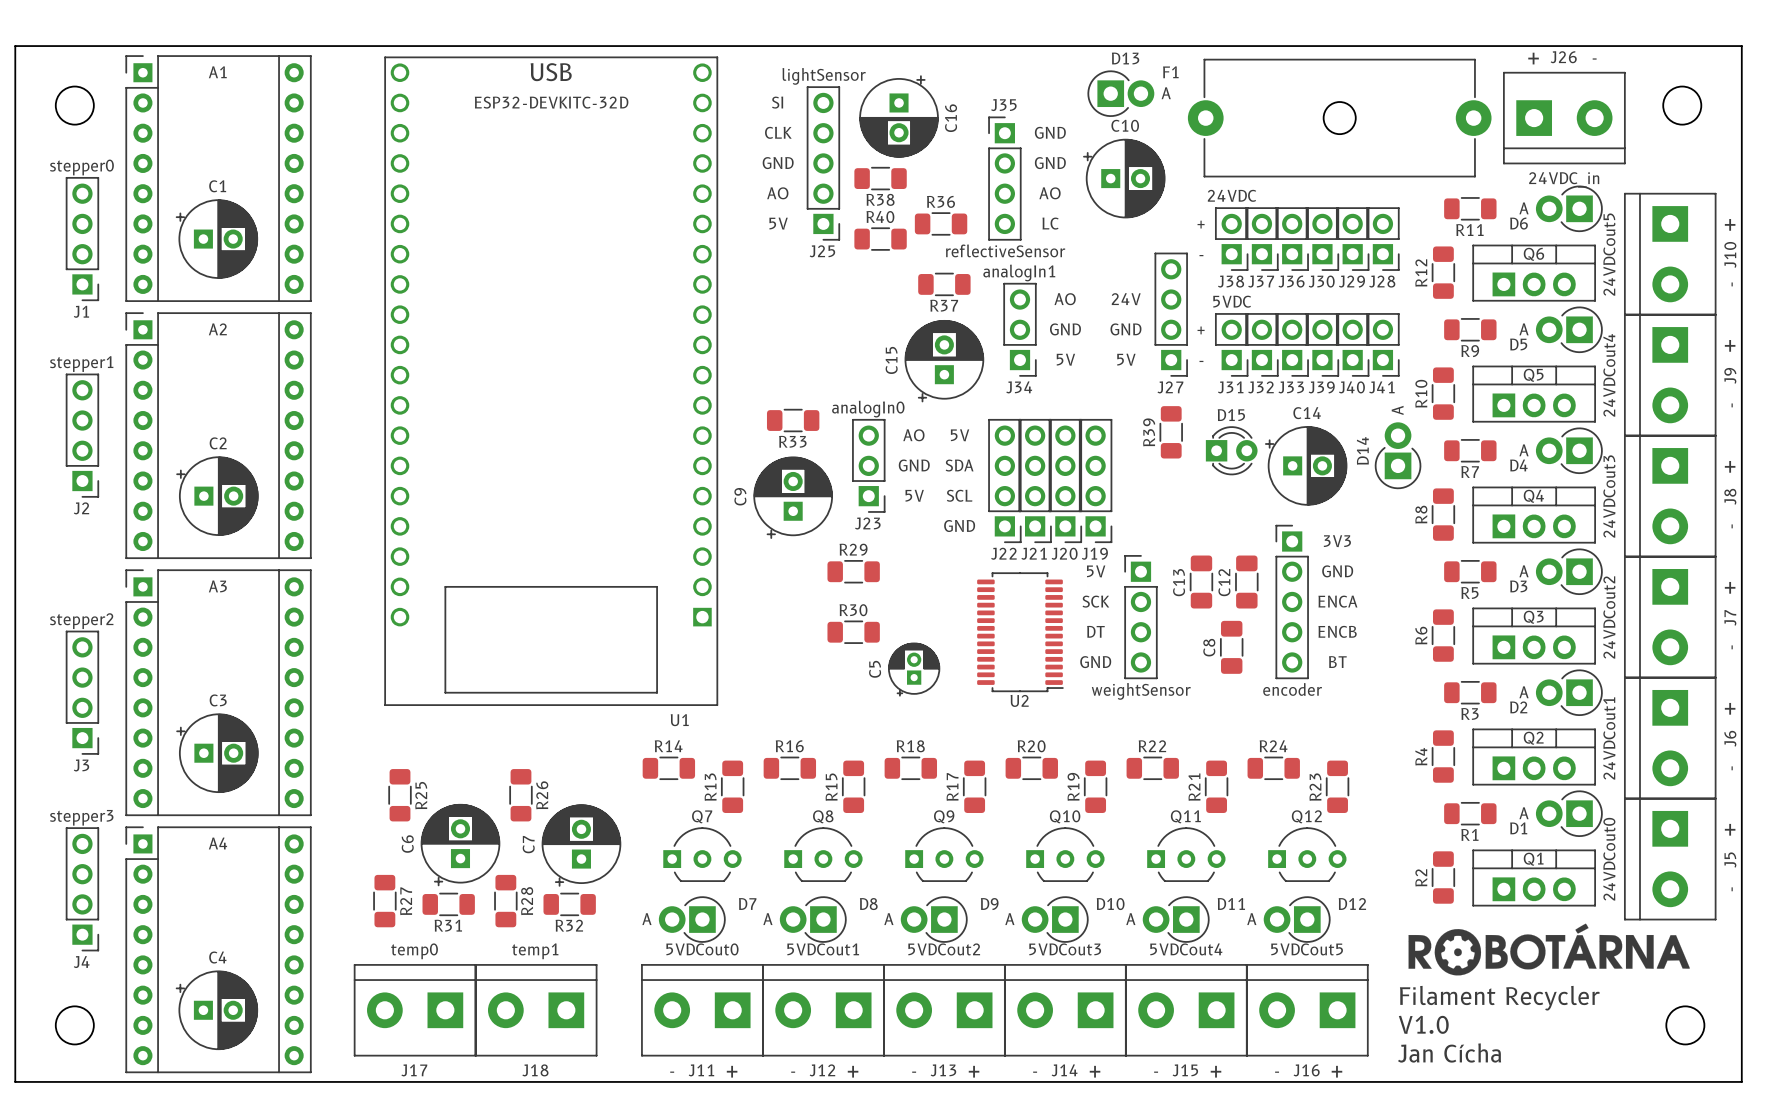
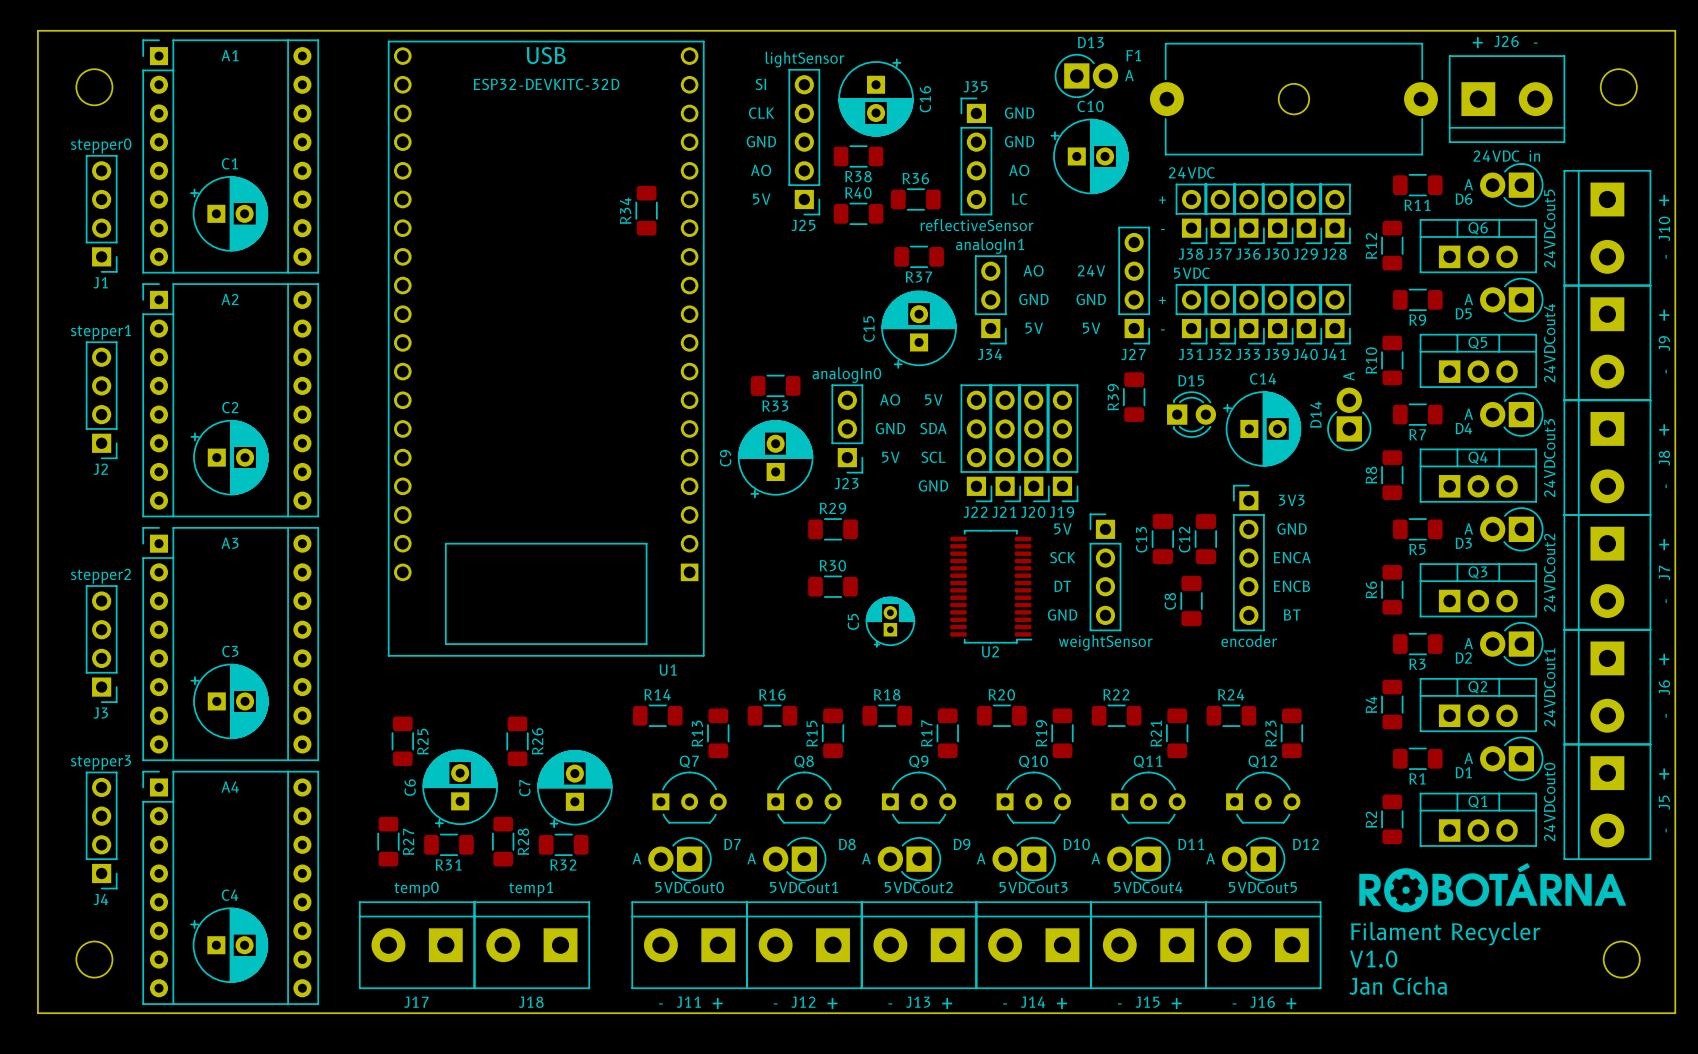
R34: none -> (646, 210)

